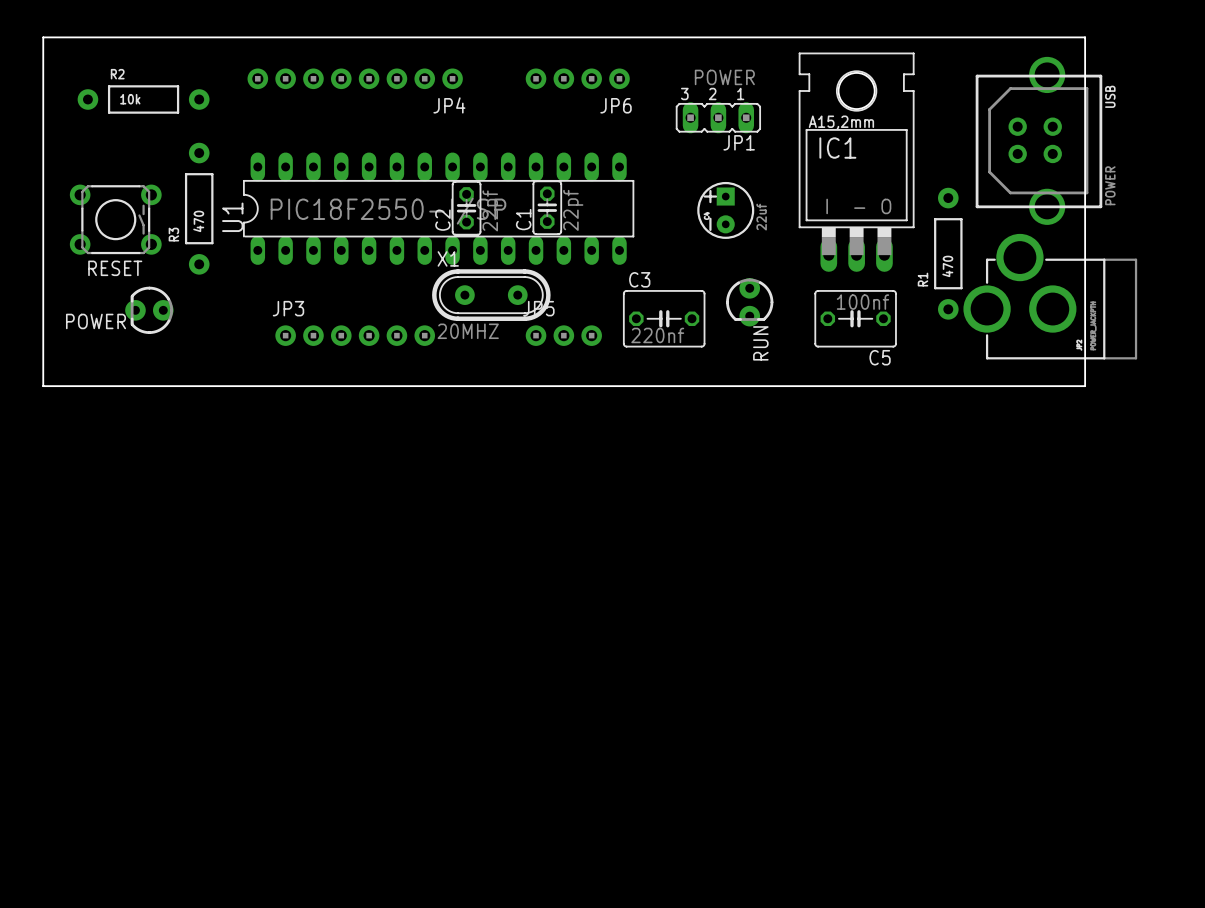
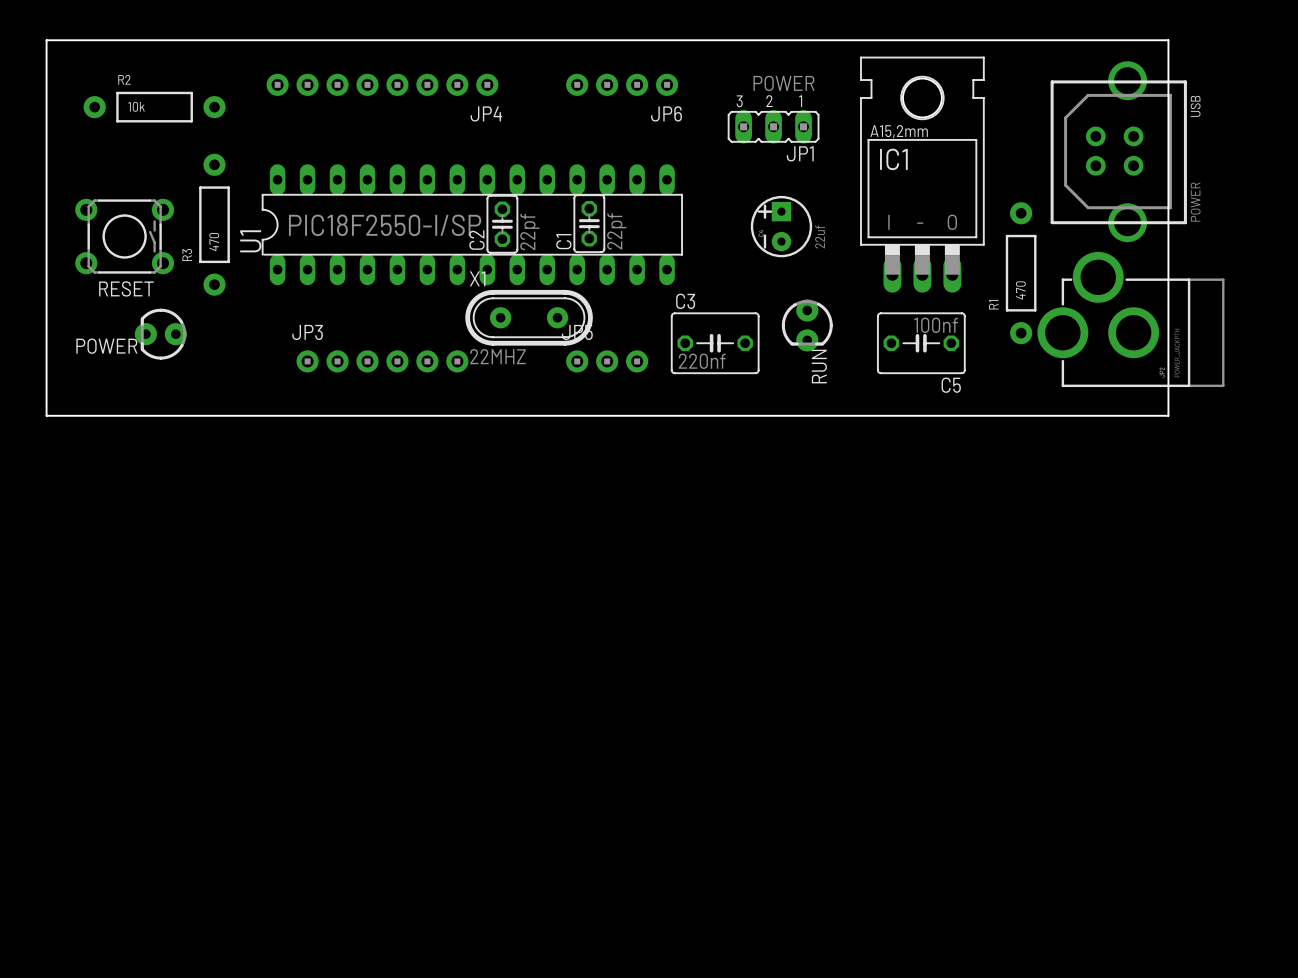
X1 value: 20MHZ (468, 331) -> 22MHZ (497, 356)

